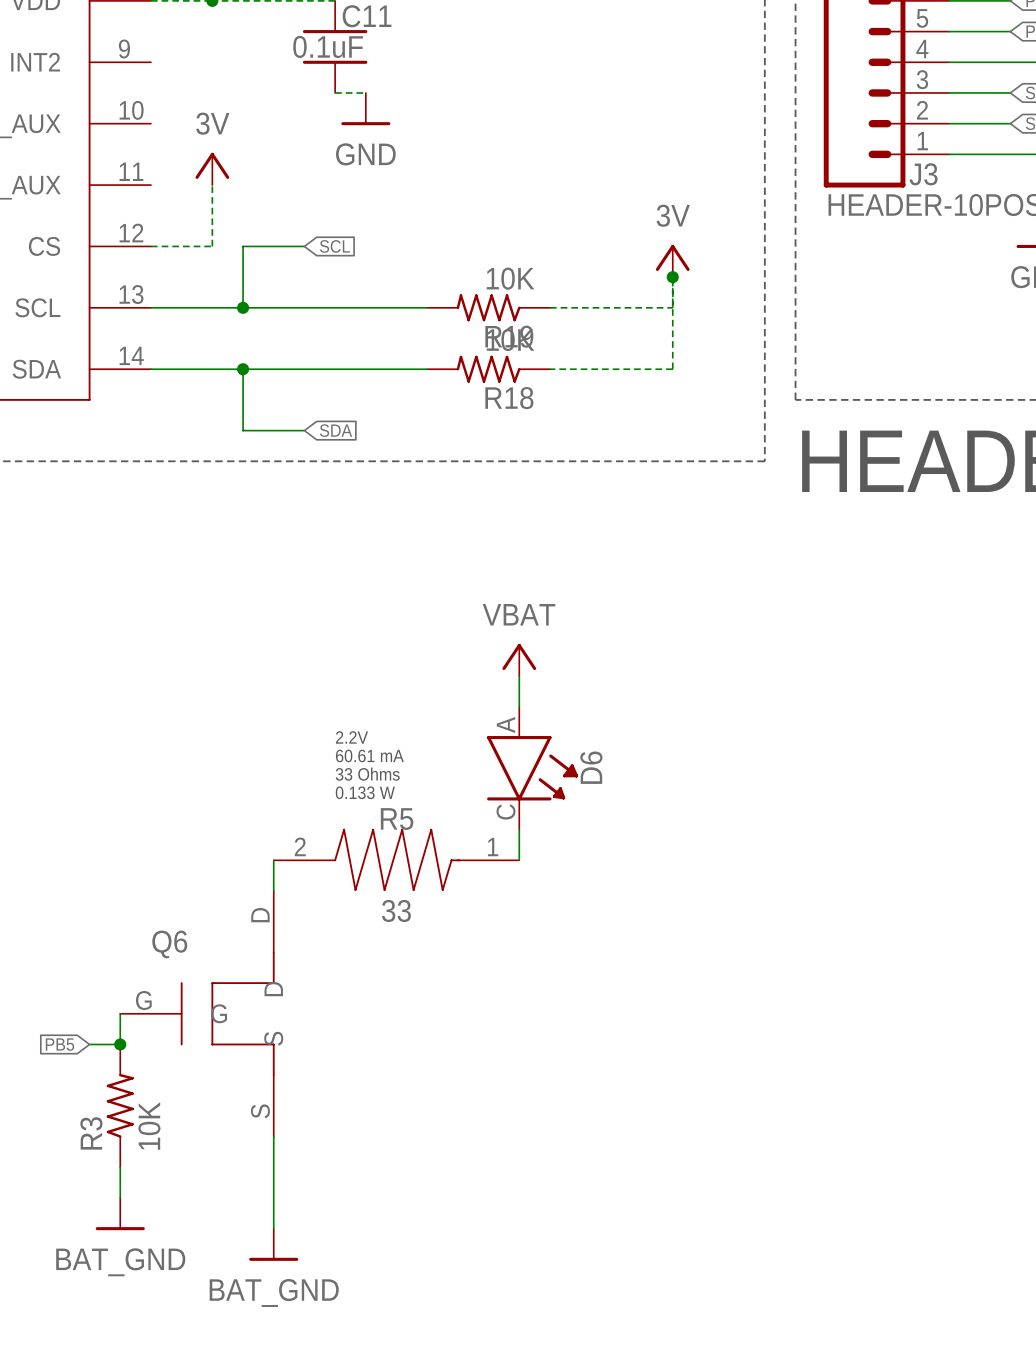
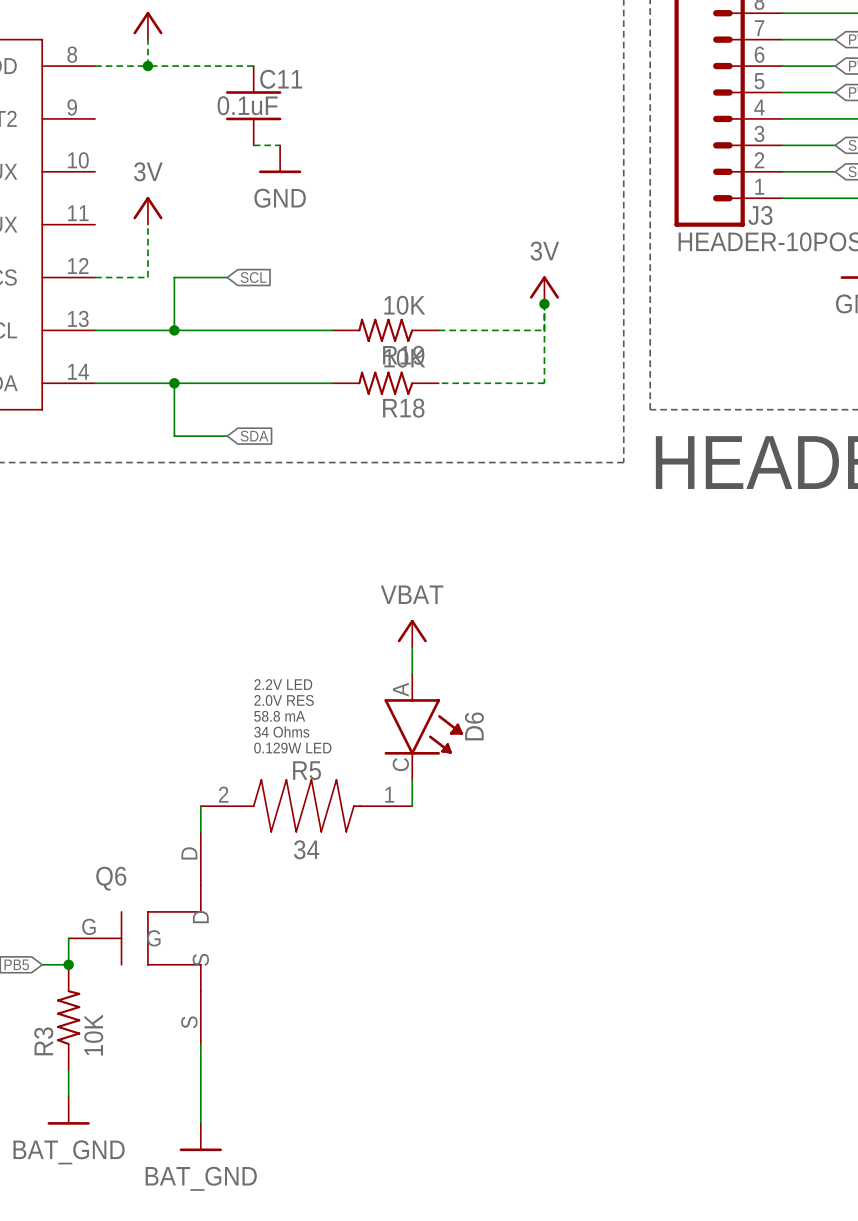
text: none -> 2.2V LED (283, 684)
text: 2.2V (352, 737) -> 2.0V RES (284, 700)
text: 60.61 mA (369, 755) -> 58.8 mA (279, 716)
text: 33 Ohms (367, 774) -> 34 Ohms (281, 731)
text: 0.133 W (365, 792) -> 0.129W LED (292, 748)
R5 value: 33 (396, 910) -> 34 (306, 849)

